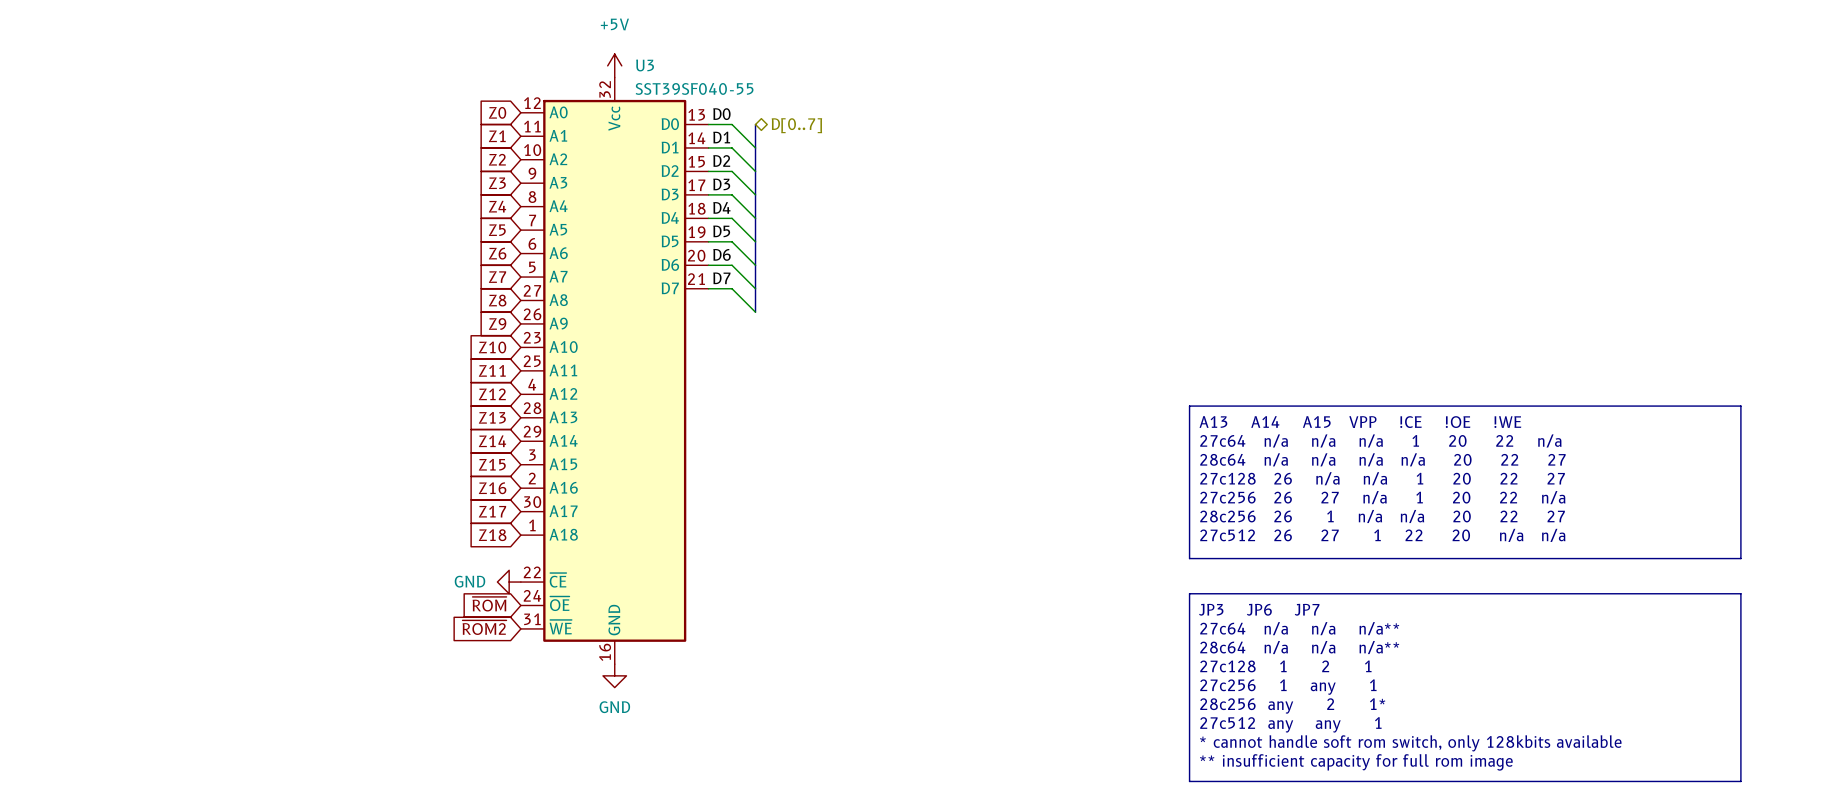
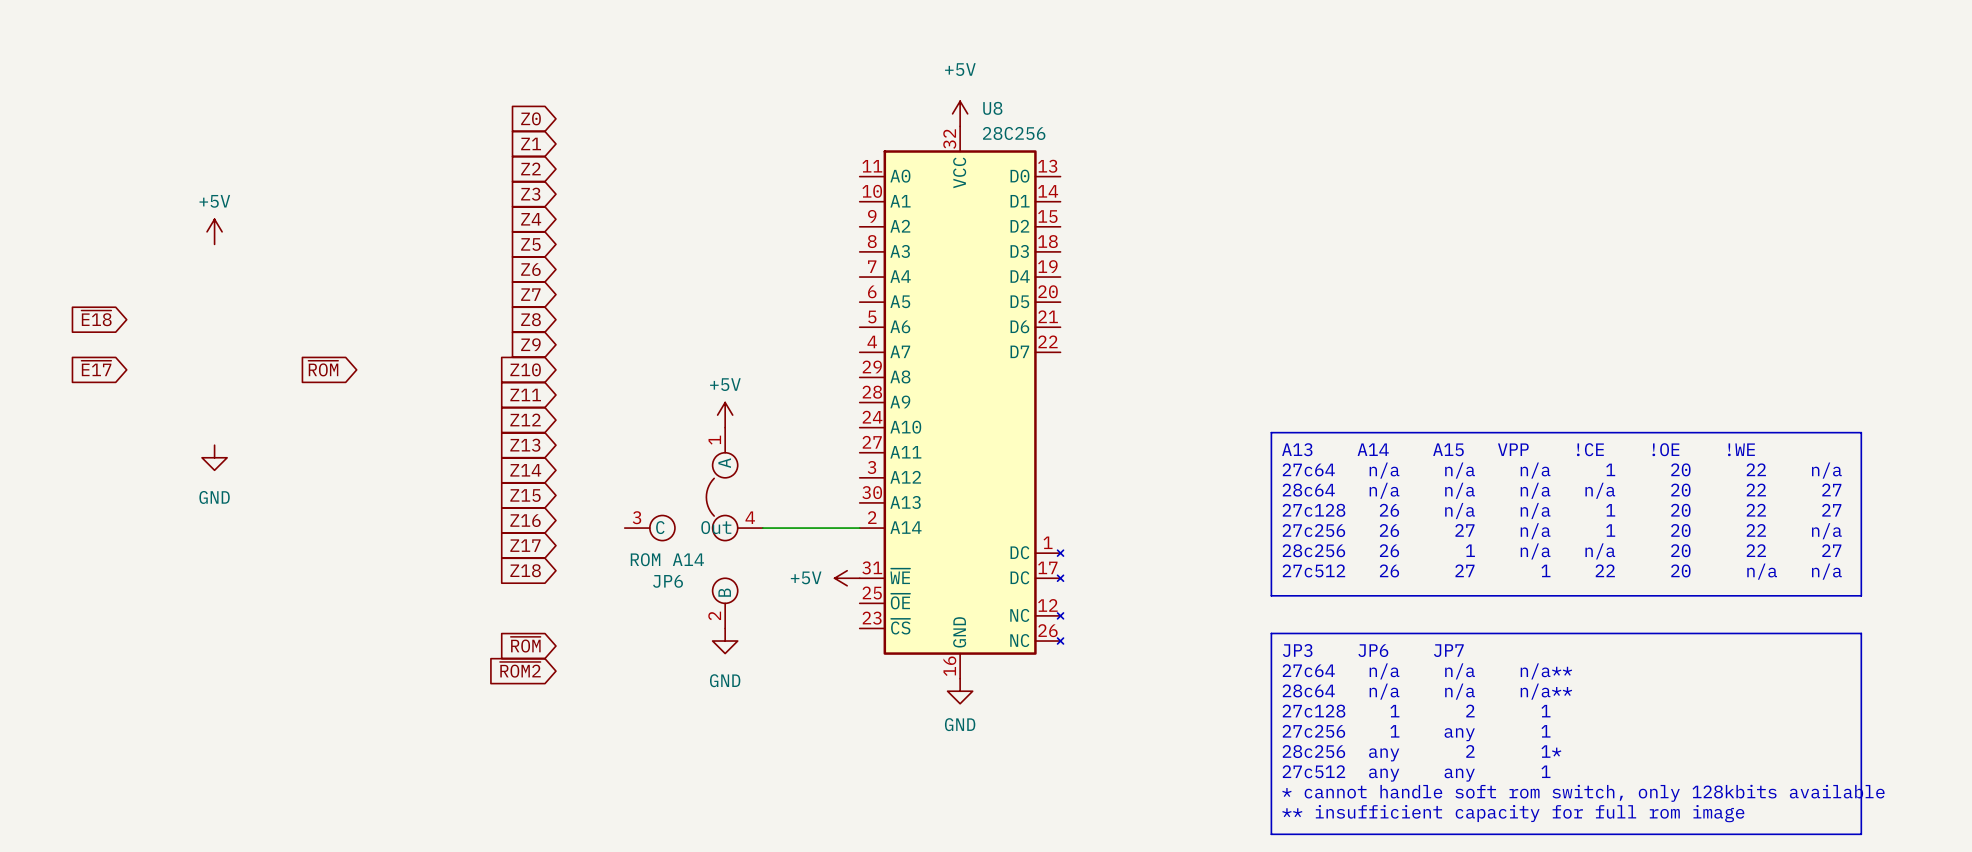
power symbol: +5V (614, 65) -> none
power symbol: none -> +5V (960, 113)
label: D0 (721, 114) -> none
wire: (708, 124) (732, 124) (755, 147) -> none
bus: (755, 124) (755, 312) -> none
hierarchical label: D[0..7] (796, 125) -> none
label: D1 (721, 137) -> none
wire: (708, 147) (732, 147) (755, 171) -> none
label: D2 (721, 160) -> none
wire: (708, 171) (732, 171) (755, 194) -> none
label: D3 (721, 184) -> none
wire: (708, 194) (732, 194) (755, 218) -> none
label: D4 (721, 207) -> none
power symbol: none -> +5V (214, 231)
wire: (708, 218) (732, 218) (755, 241) -> none
label: D5 (721, 231) -> none
wire: (708, 241) (732, 241) (755, 265) -> none
label: D6 (722, 254) -> none
wire: (708, 265) (732, 265) (755, 288) -> none
label: D7 (721, 278) -> none
wire: (708, 288) (732, 288) (755, 312) -> none
global label: none -> ~{E18} (96, 318)
global label: none -> ~{E17} (96, 368)
global label: none -> ~{ROM} (323, 368)
U3: SST39SF040-55 (614, 370) -> none
U8: none -> 28C256 (961, 402)
power symbol: none -> +5V (725, 415)
power symbol: none -> GND (214, 457)
JP6: none -> ROM A14 (693, 528)
wire: none -> (762, 528) (859, 528)
power symbol: none -> +5V (847, 578)
power symbol: GND (509, 582) -> none
power symbol: none -> GND (725, 641)
power symbol: none -> GND (960, 691)
power symbol: GND (614, 675) -> none

